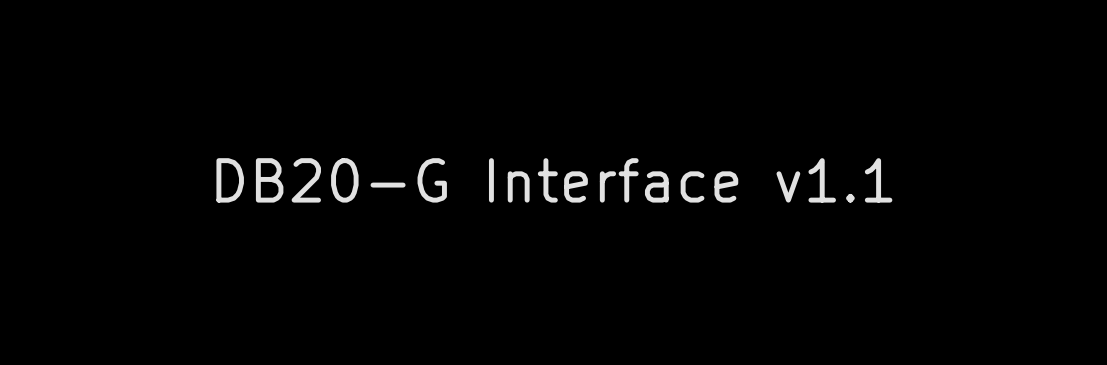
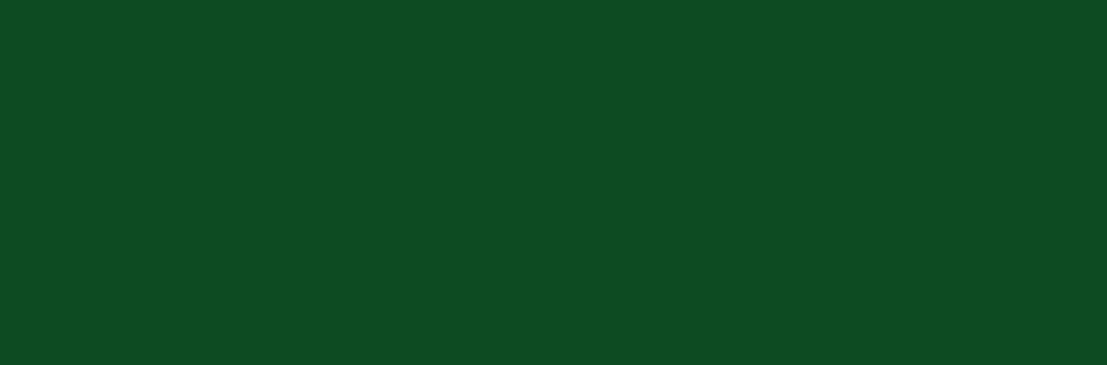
text: DB20-G Interface v1.1 (554, 180) -> none

